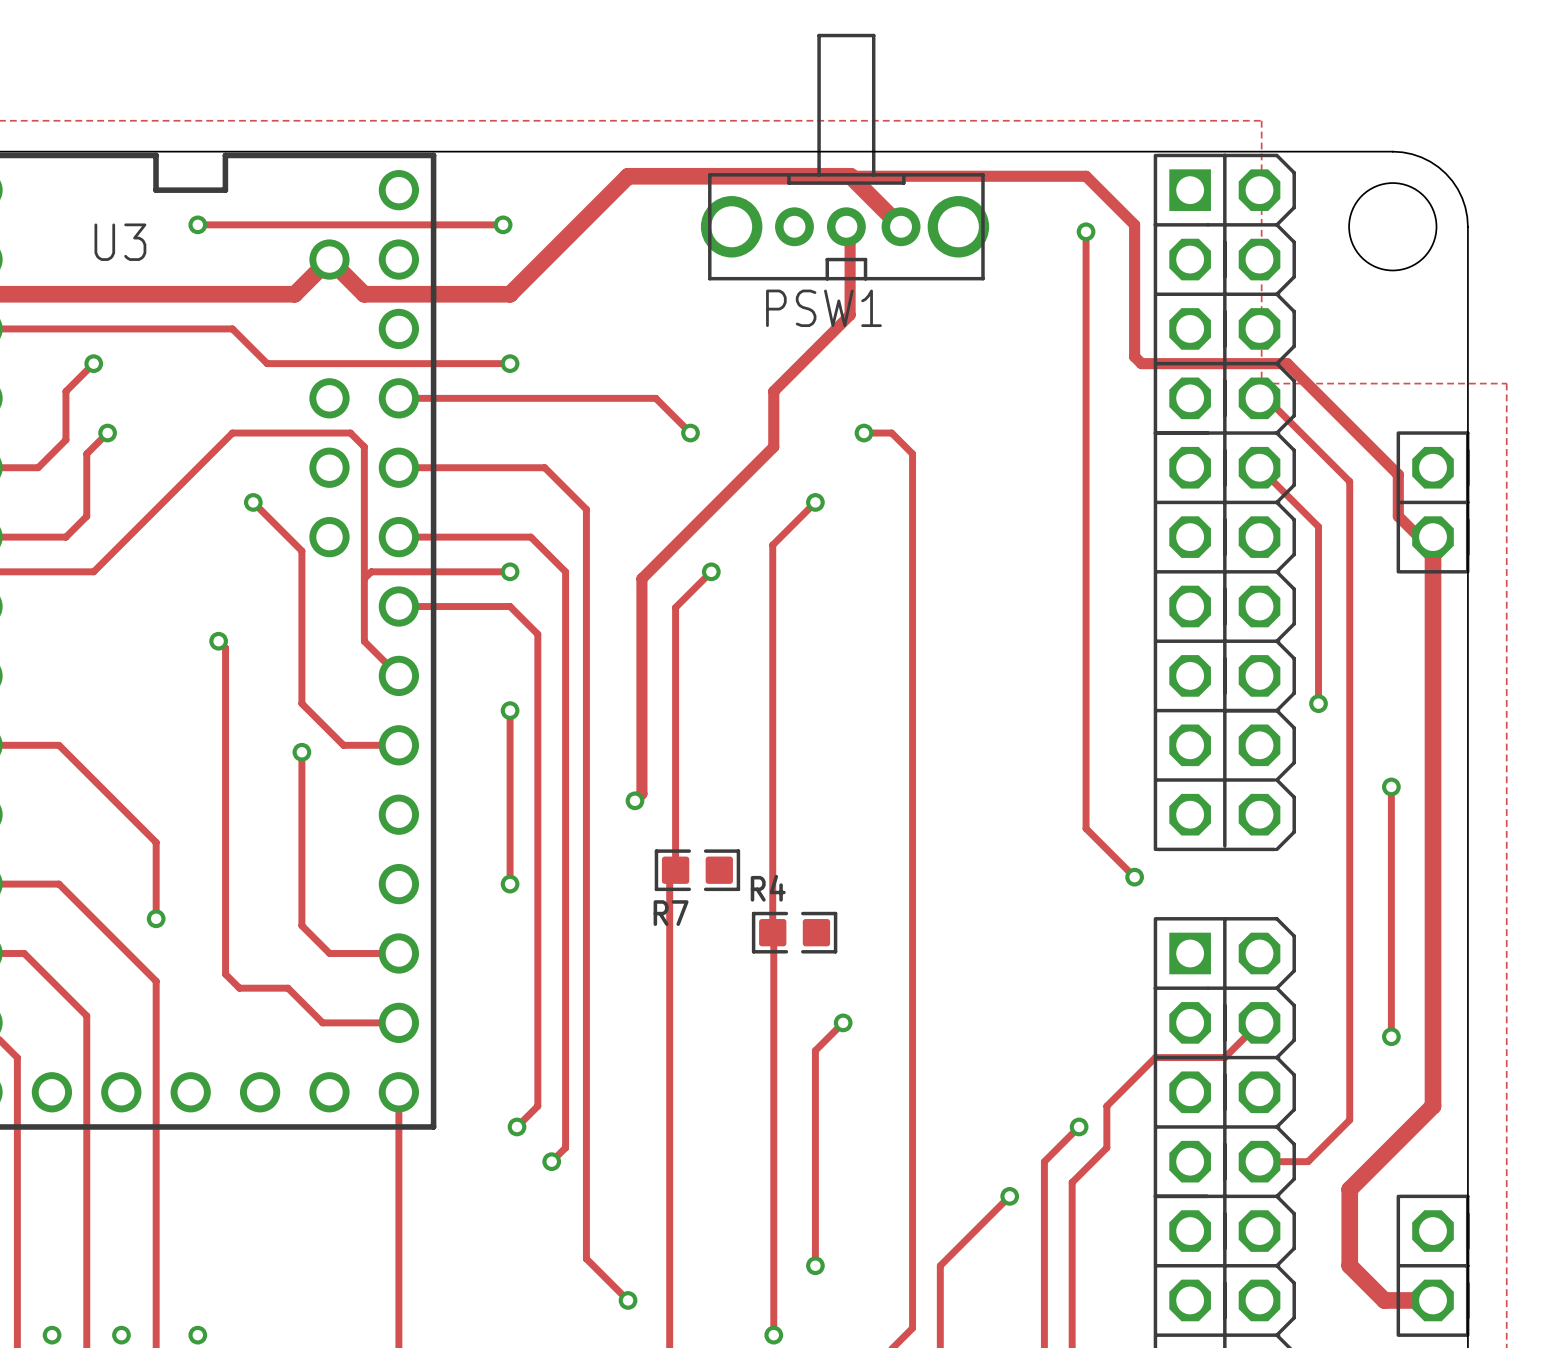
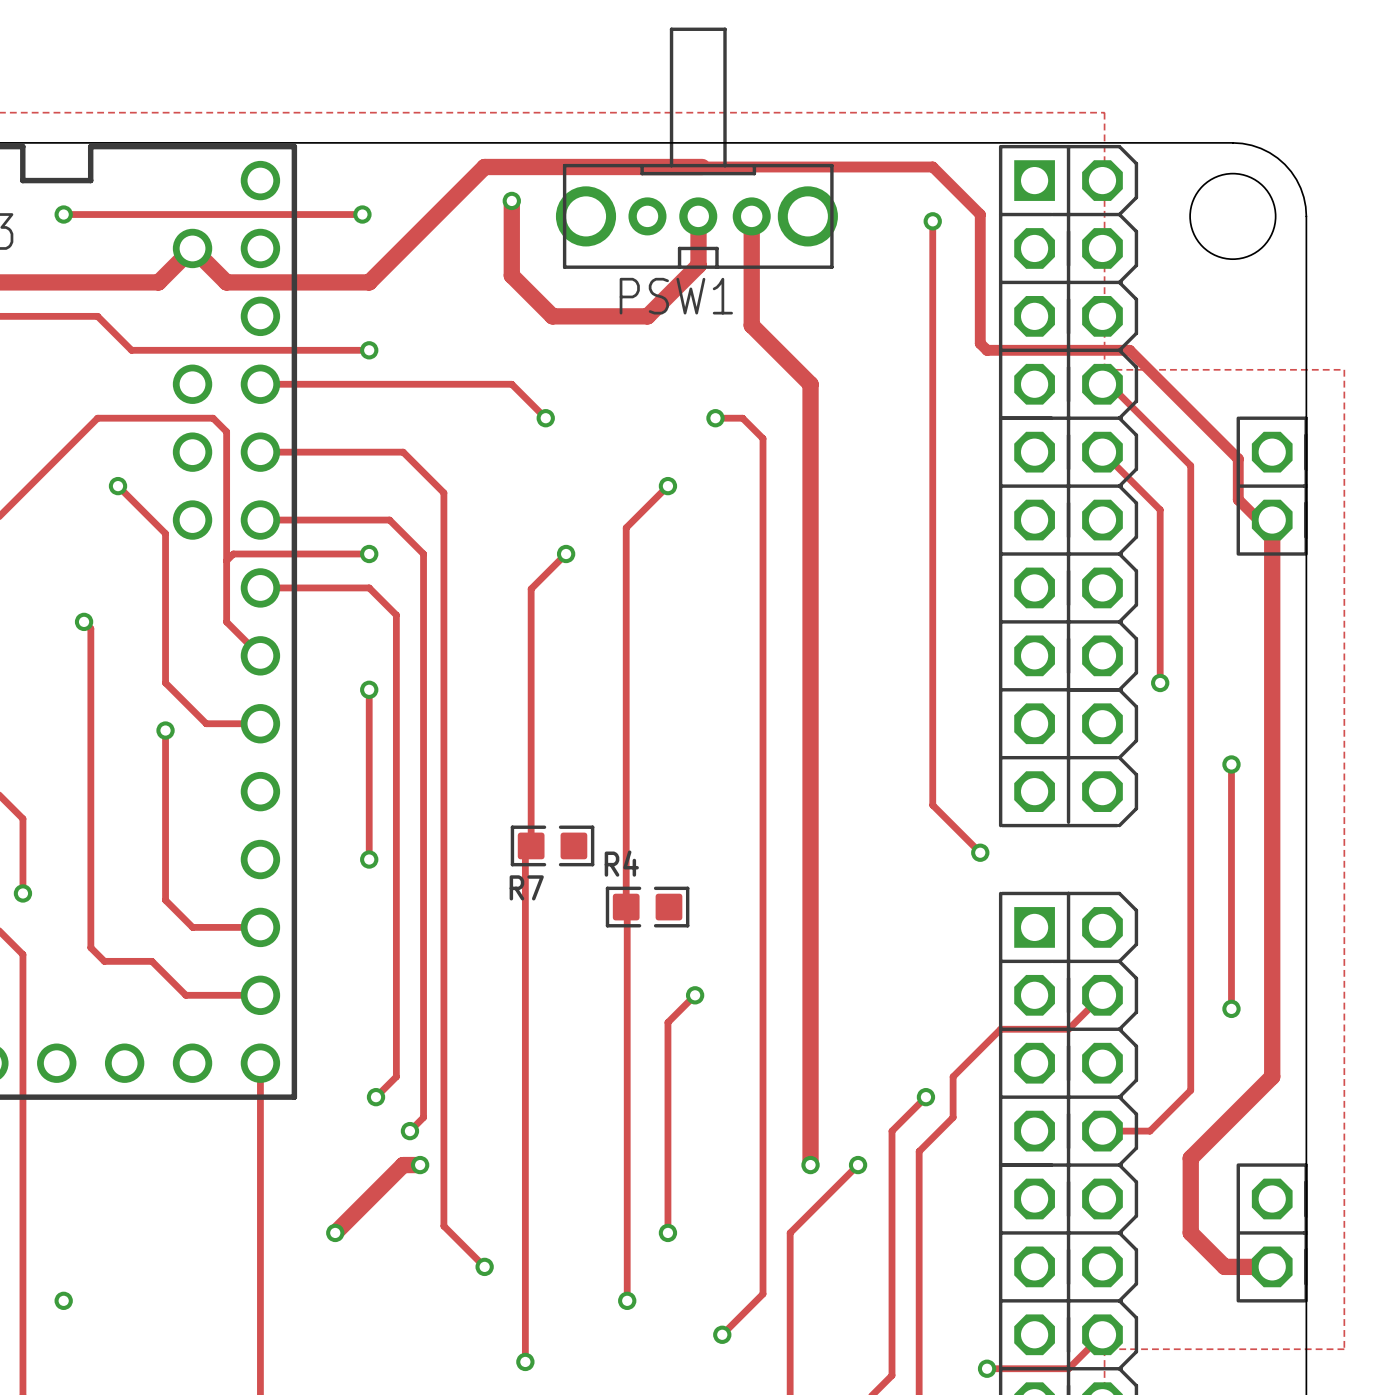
track: (850, 176) (901, 226) -> (810, 1165) (810, 384) (751, 325) (751, 216)
via: none -> (511, 200)
track: (846, 226) (850, 230) (850, 315) (773, 391) (773, 446) (641, 578) (641, 793) (634, 800) -> (698, 216) (698, 265) (647, 316) (552, 316) (511, 275) (511, 200)
via: (634, 800) -> none
track: none -> (420, 1165) (403, 1165) (335, 1232)
via: none -> (420, 1165)
via: none -> (810, 1165)
via: none -> (335, 1232)

